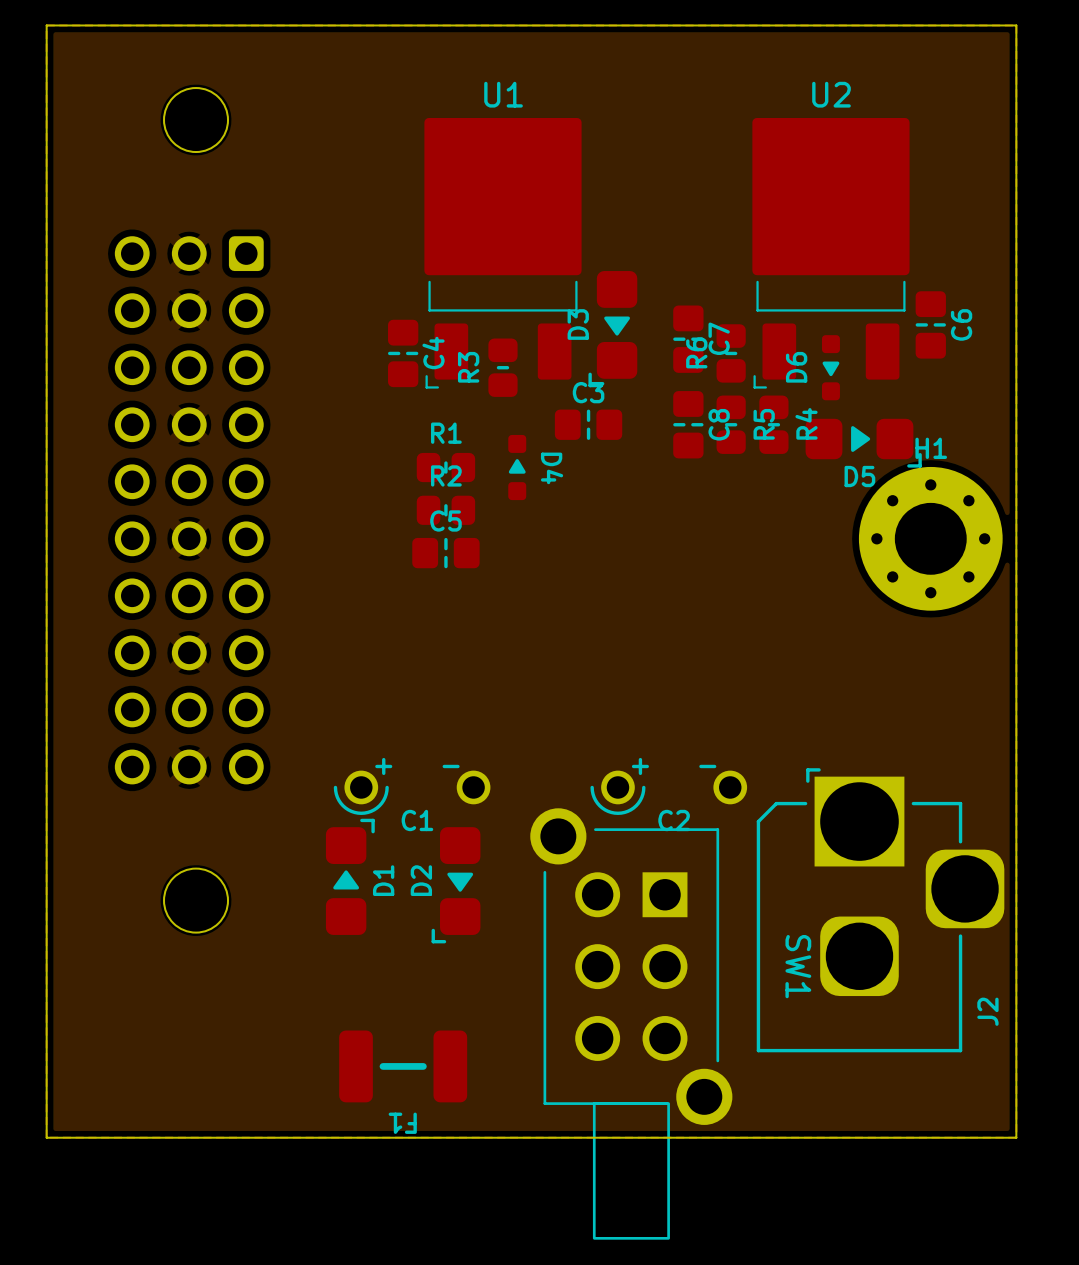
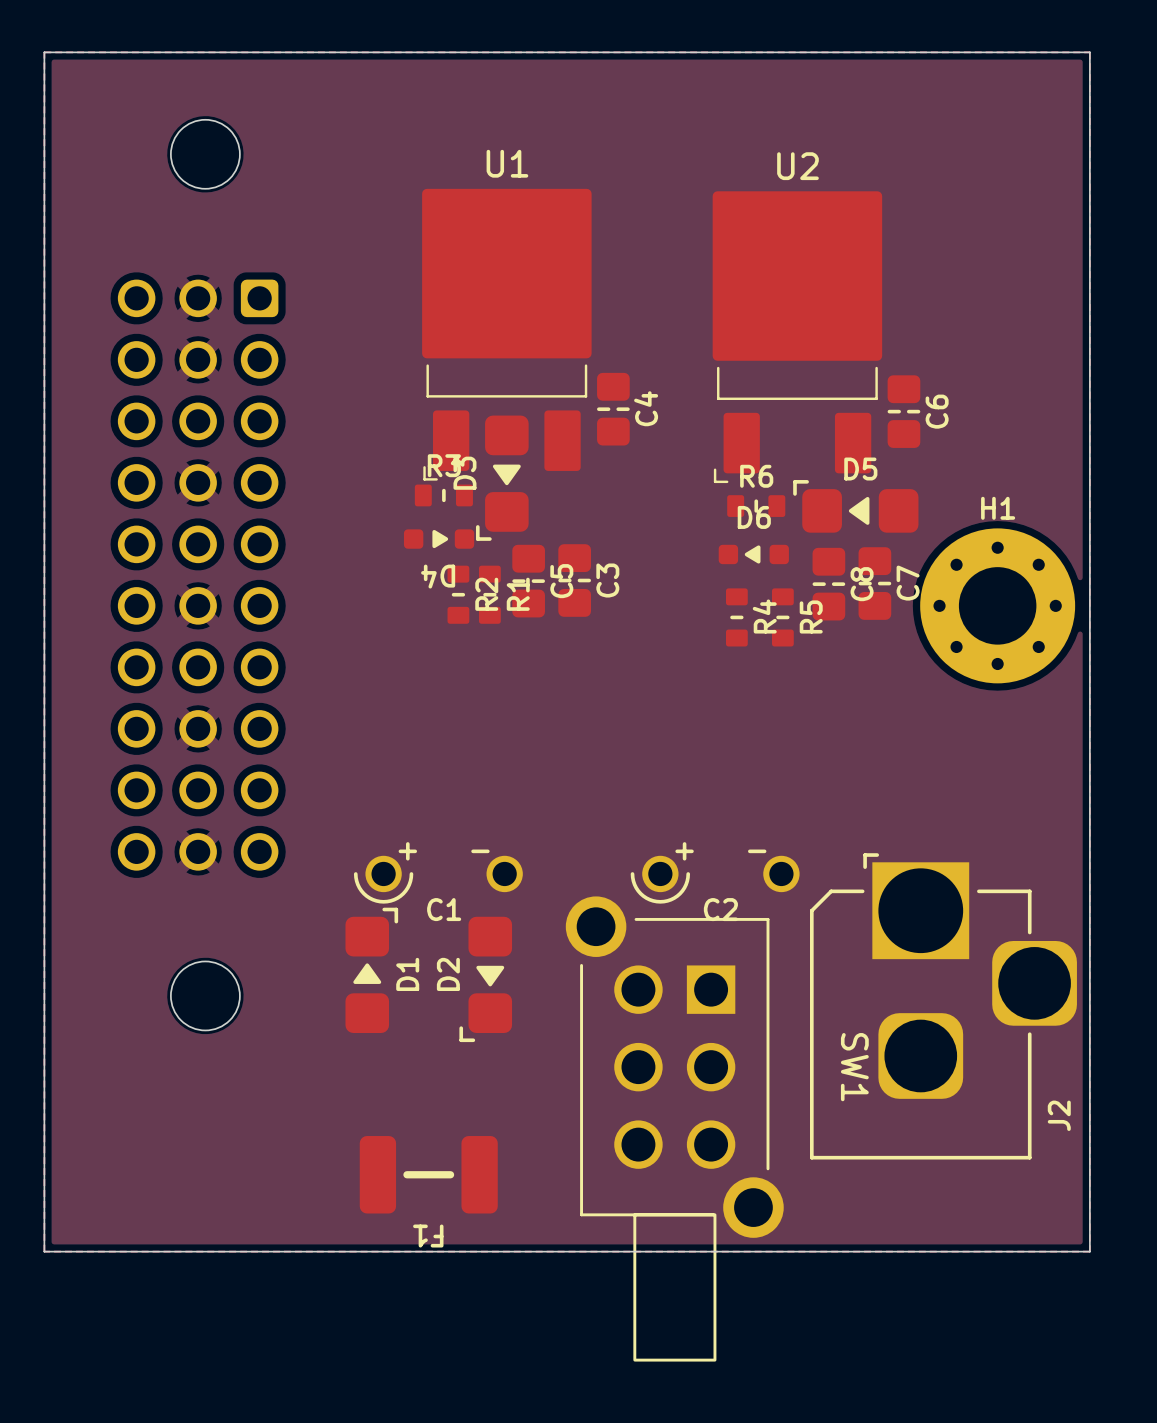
U1 position: (502, 253) -> (506, 334)
U2 position: (830, 253) -> (797, 337)
R6 footprint: [716, 324, 746, 383] -> [727, 495, 786, 517]
C6 position: (930, 324) -> (903, 411)
D3 position: (612, 329) -> (502, 478)
R3 footprint: [488, 338, 518, 397] -> [414, 484, 473, 507]
C7 position: (688, 339) -> (874, 583)
C4 position: (403, 353) -> (613, 409)
D6 rotation: 0° (830, 367) -> 90° clockwise (753, 554)
D6 position: (830, 367) -> (753, 554)
R5 footprint: [716, 395, 746, 454] -> [771, 588, 794, 647]
R4 footprint: [759, 395, 789, 454] -> [725, 588, 748, 647]
C3 rotation: 0° (588, 424) -> 90° clockwise (574, 580)
C3 position: (588, 424) -> (574, 580)
C8 position: (688, 424) -> (828, 584)
D5 rotation: 0° (863, 443) -> 180° (855, 506)
R1 footprint: [416, 452, 476, 483] -> [479, 565, 501, 624]
D4 rotation: 0° (517, 467) -> 90° clockwise (439, 539)
D4 position: (517, 467) -> (439, 539)
R2 footprint: [416, 495, 476, 525] -> [447, 565, 470, 624]
C5 rotation: 0° (445, 553) -> 90° clockwise (528, 581)
C5 position: (445, 553) -> (528, 581)

